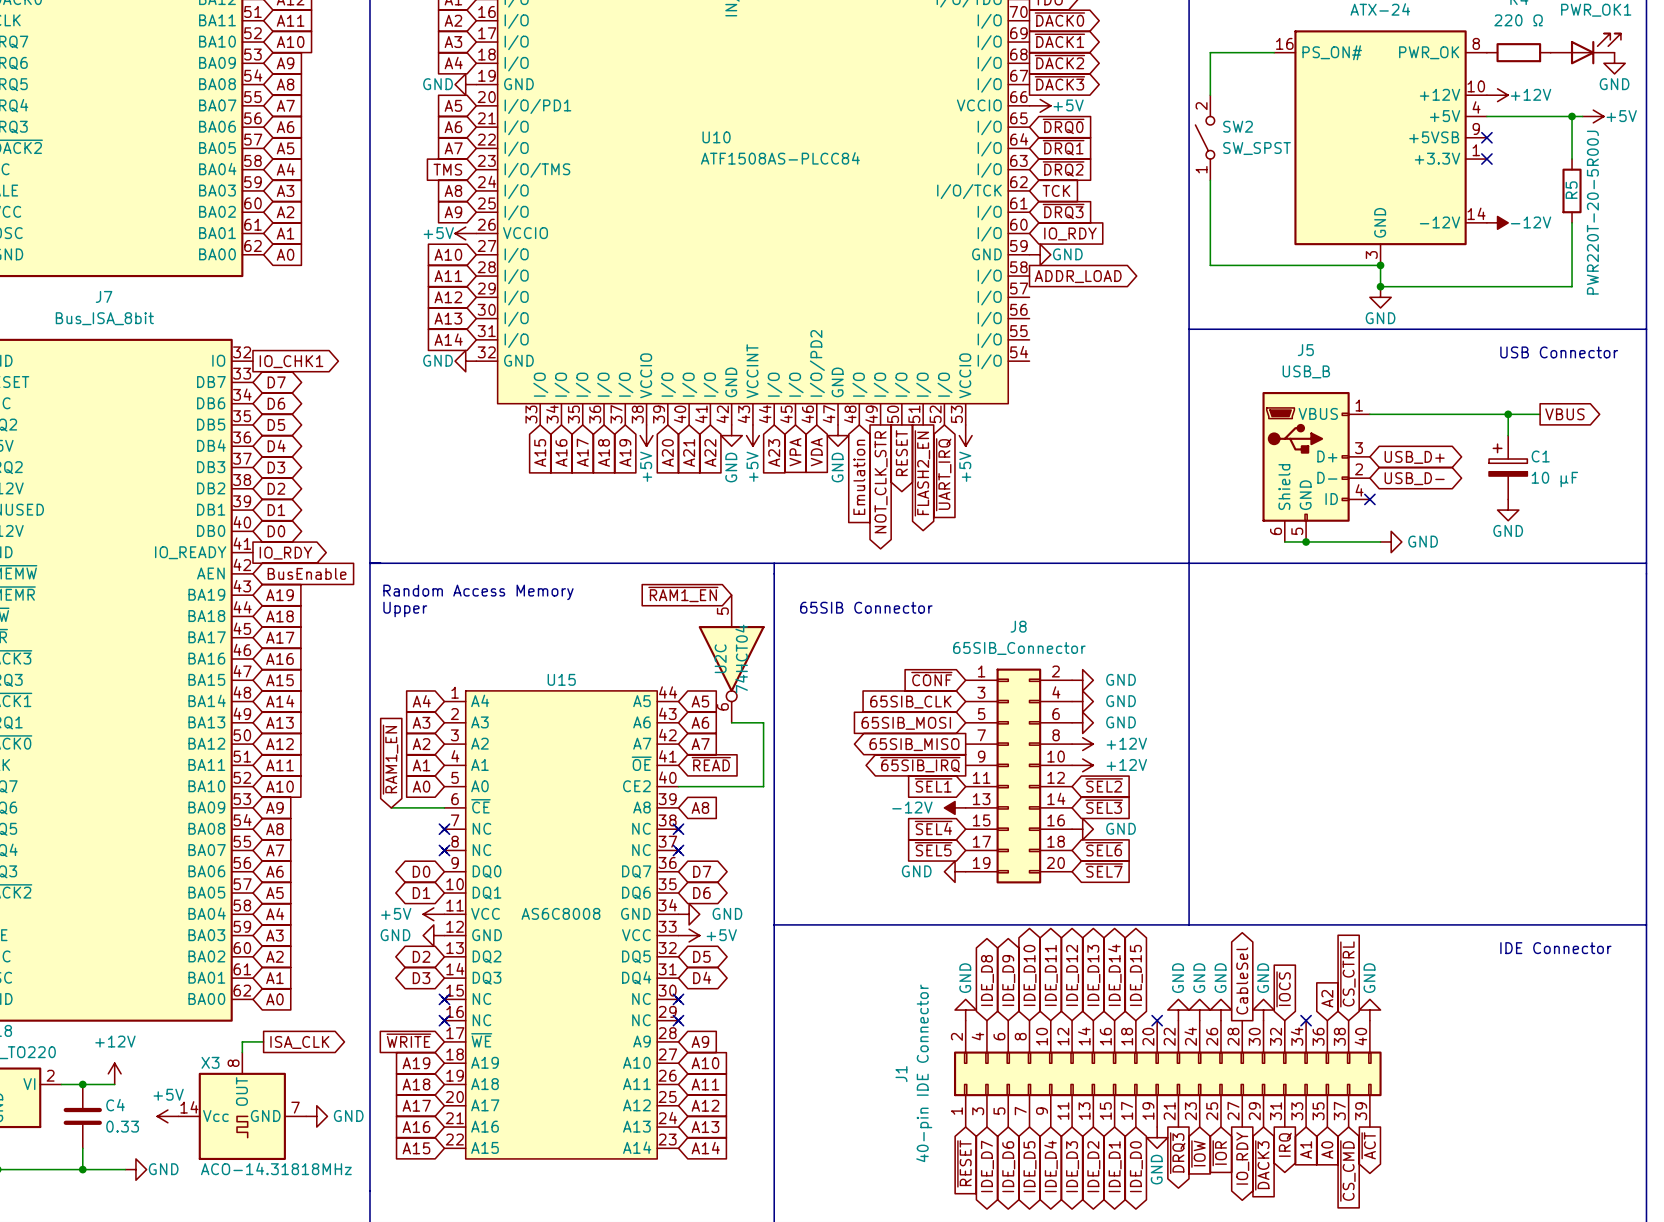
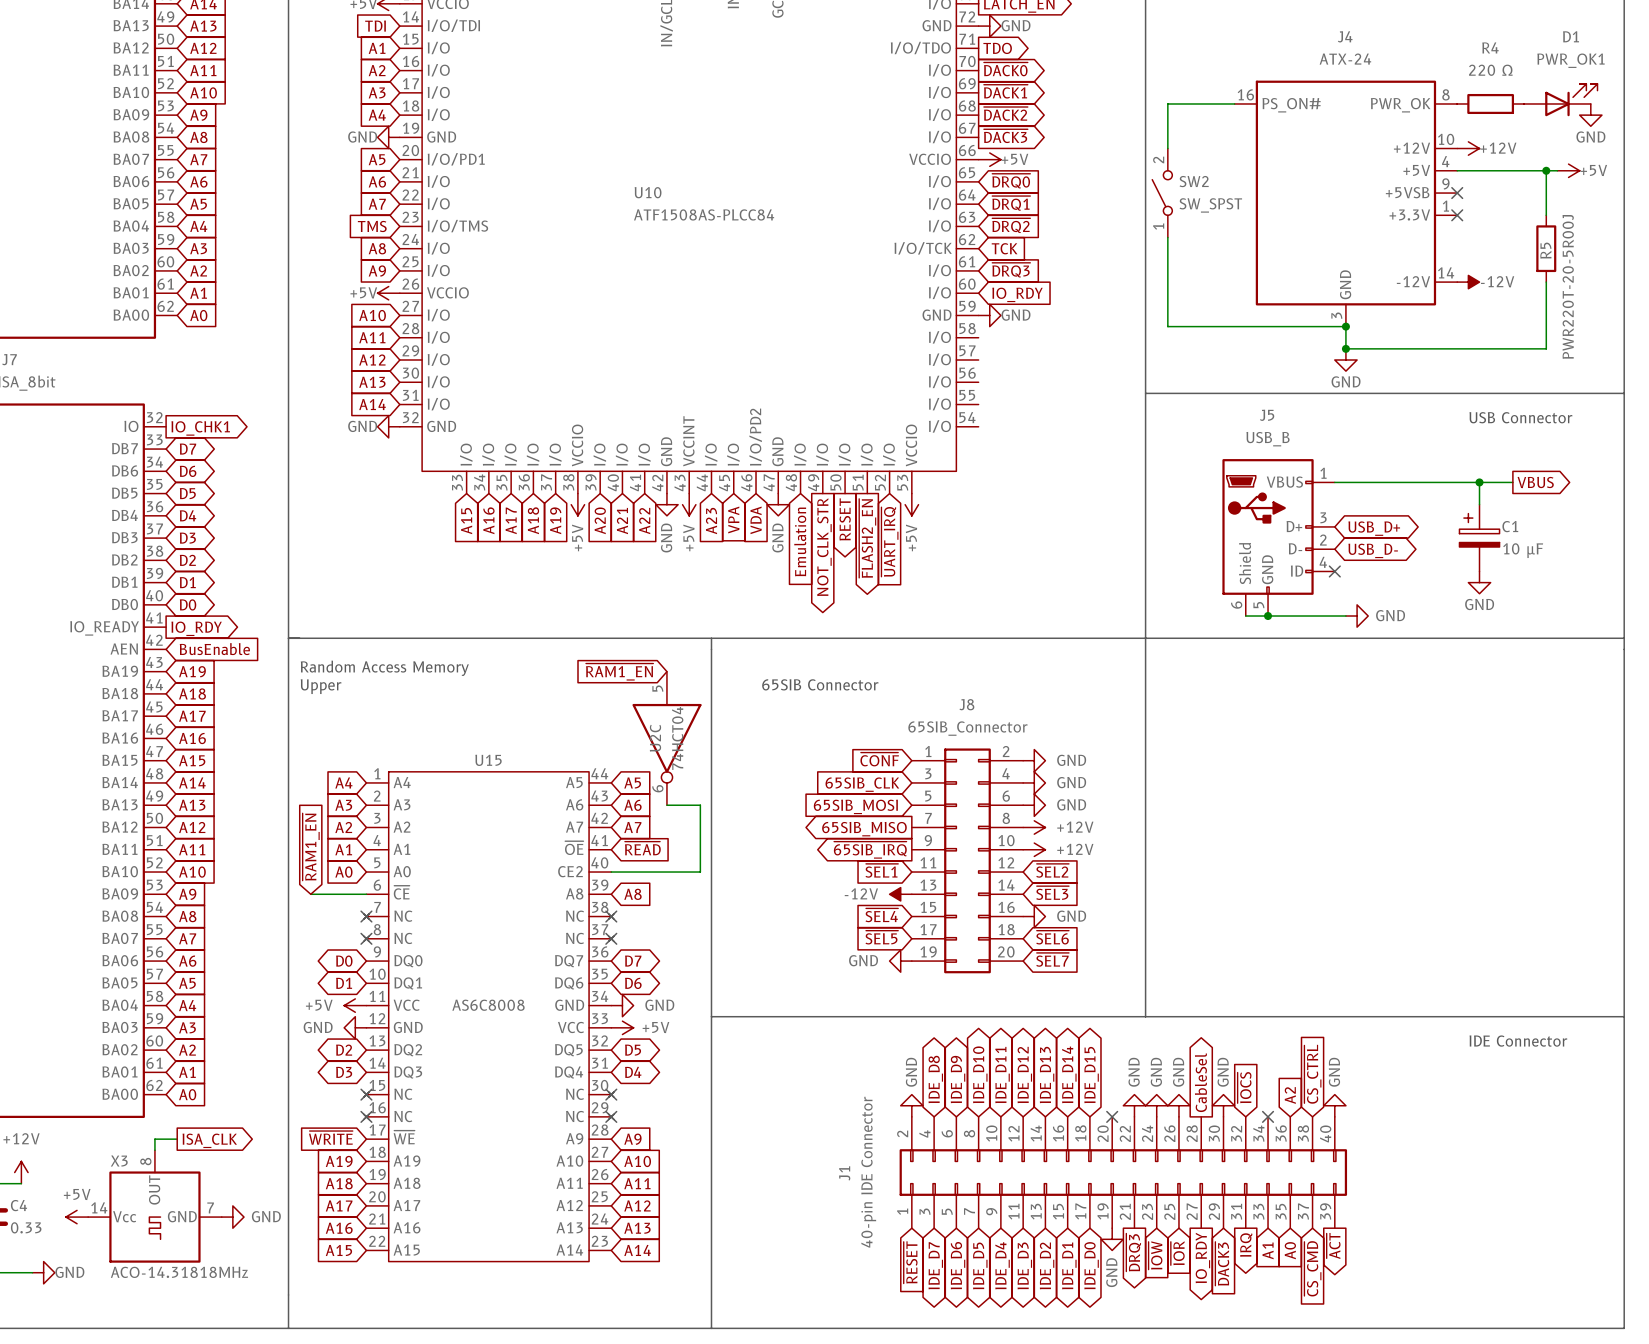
global label: ADDR_LOAD (1078, 276) -> none

